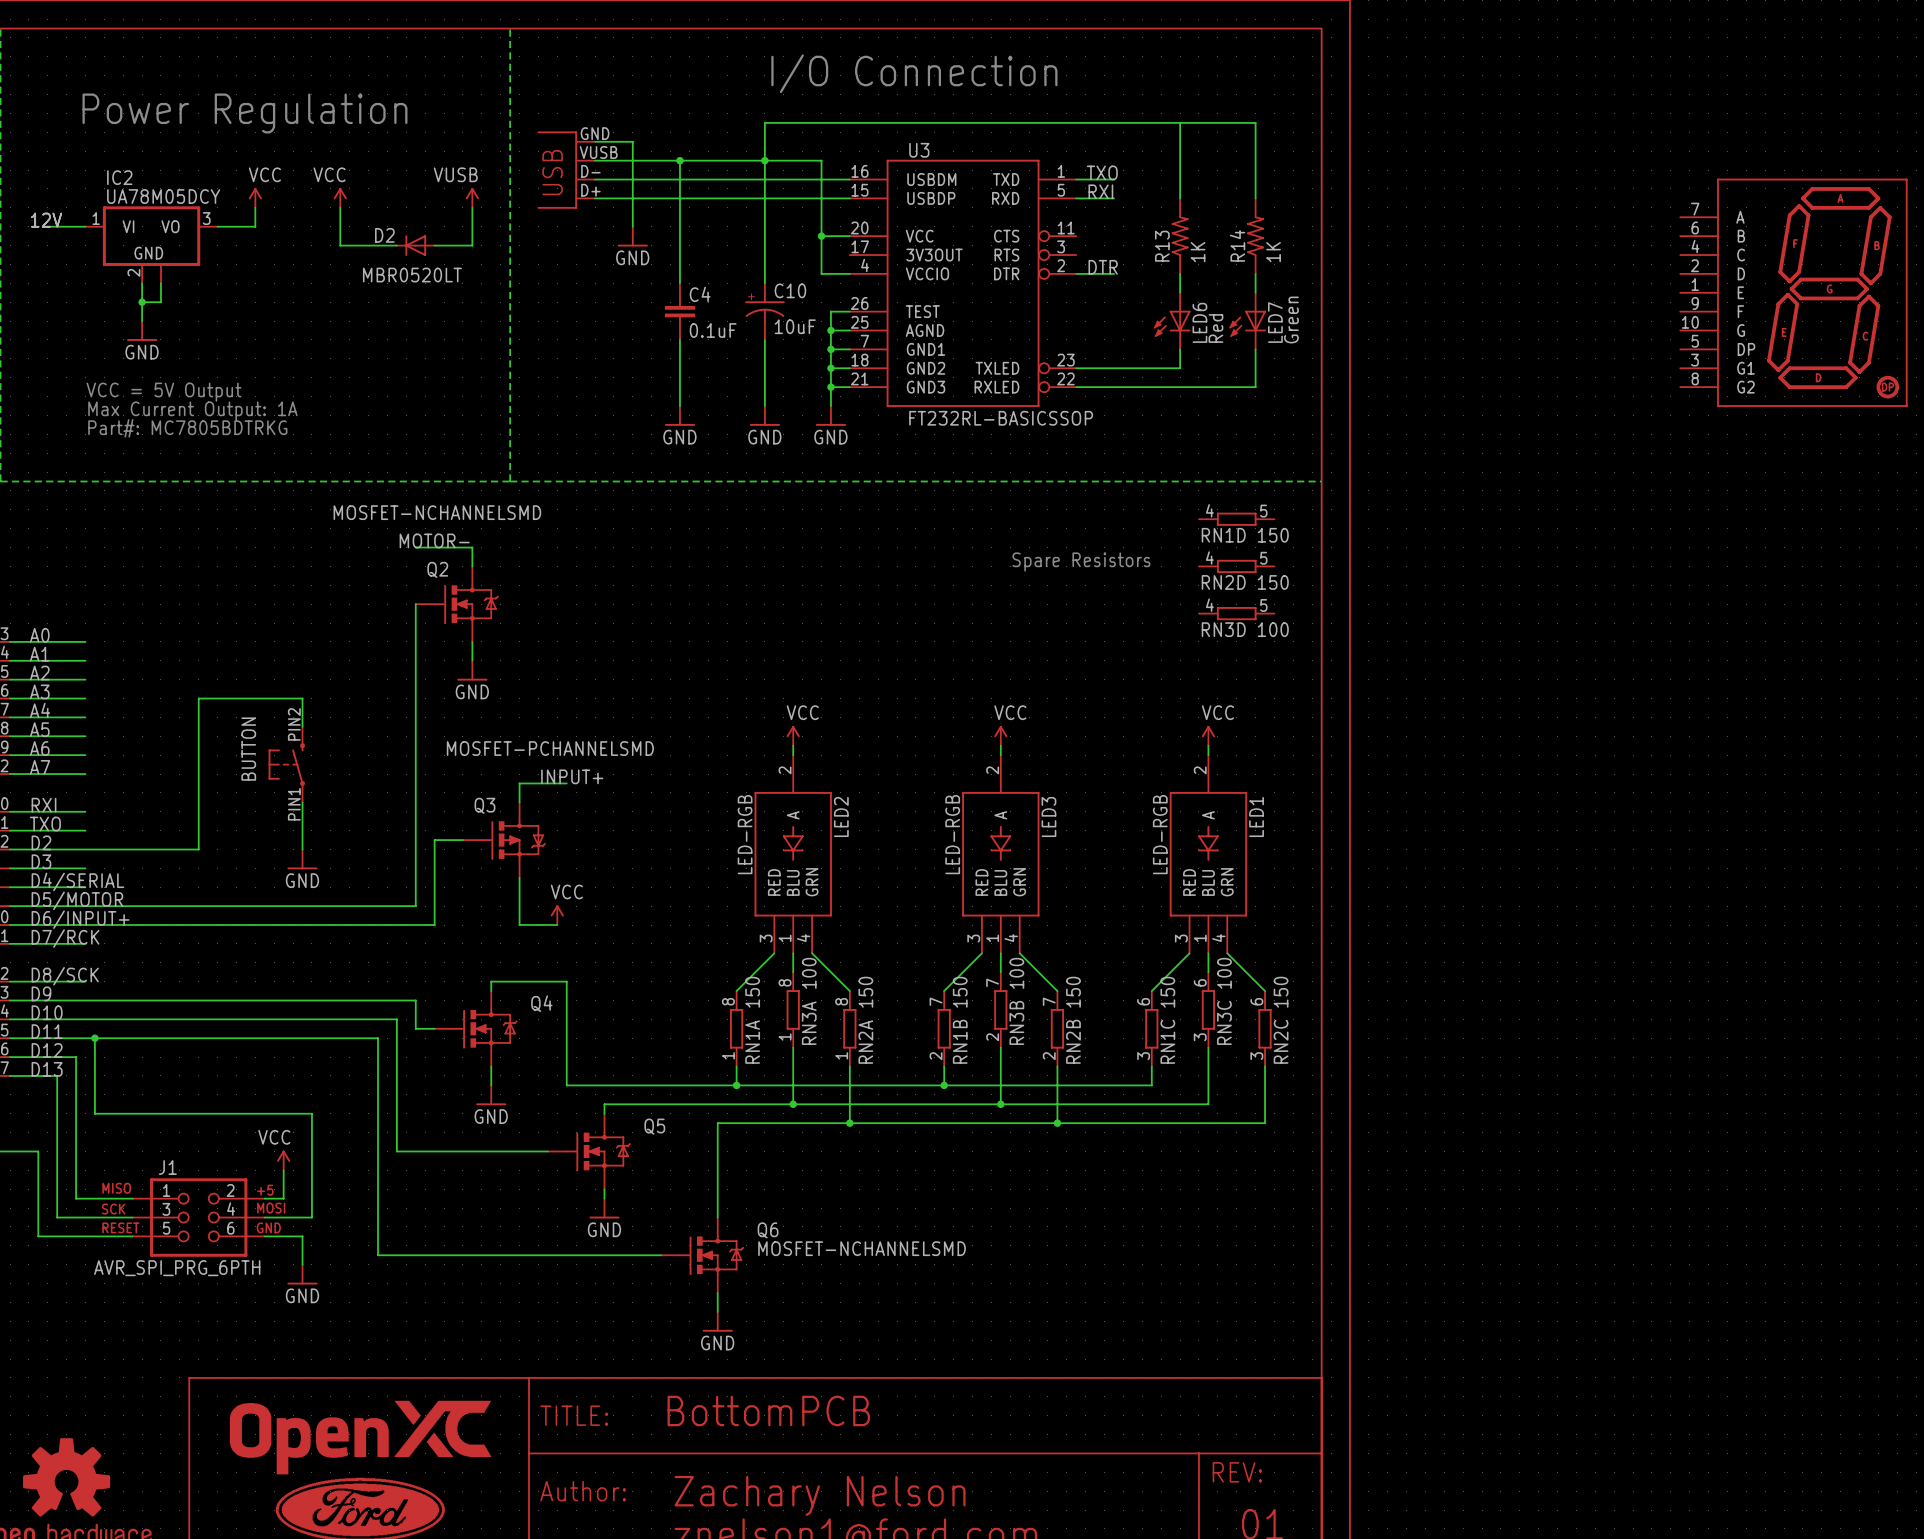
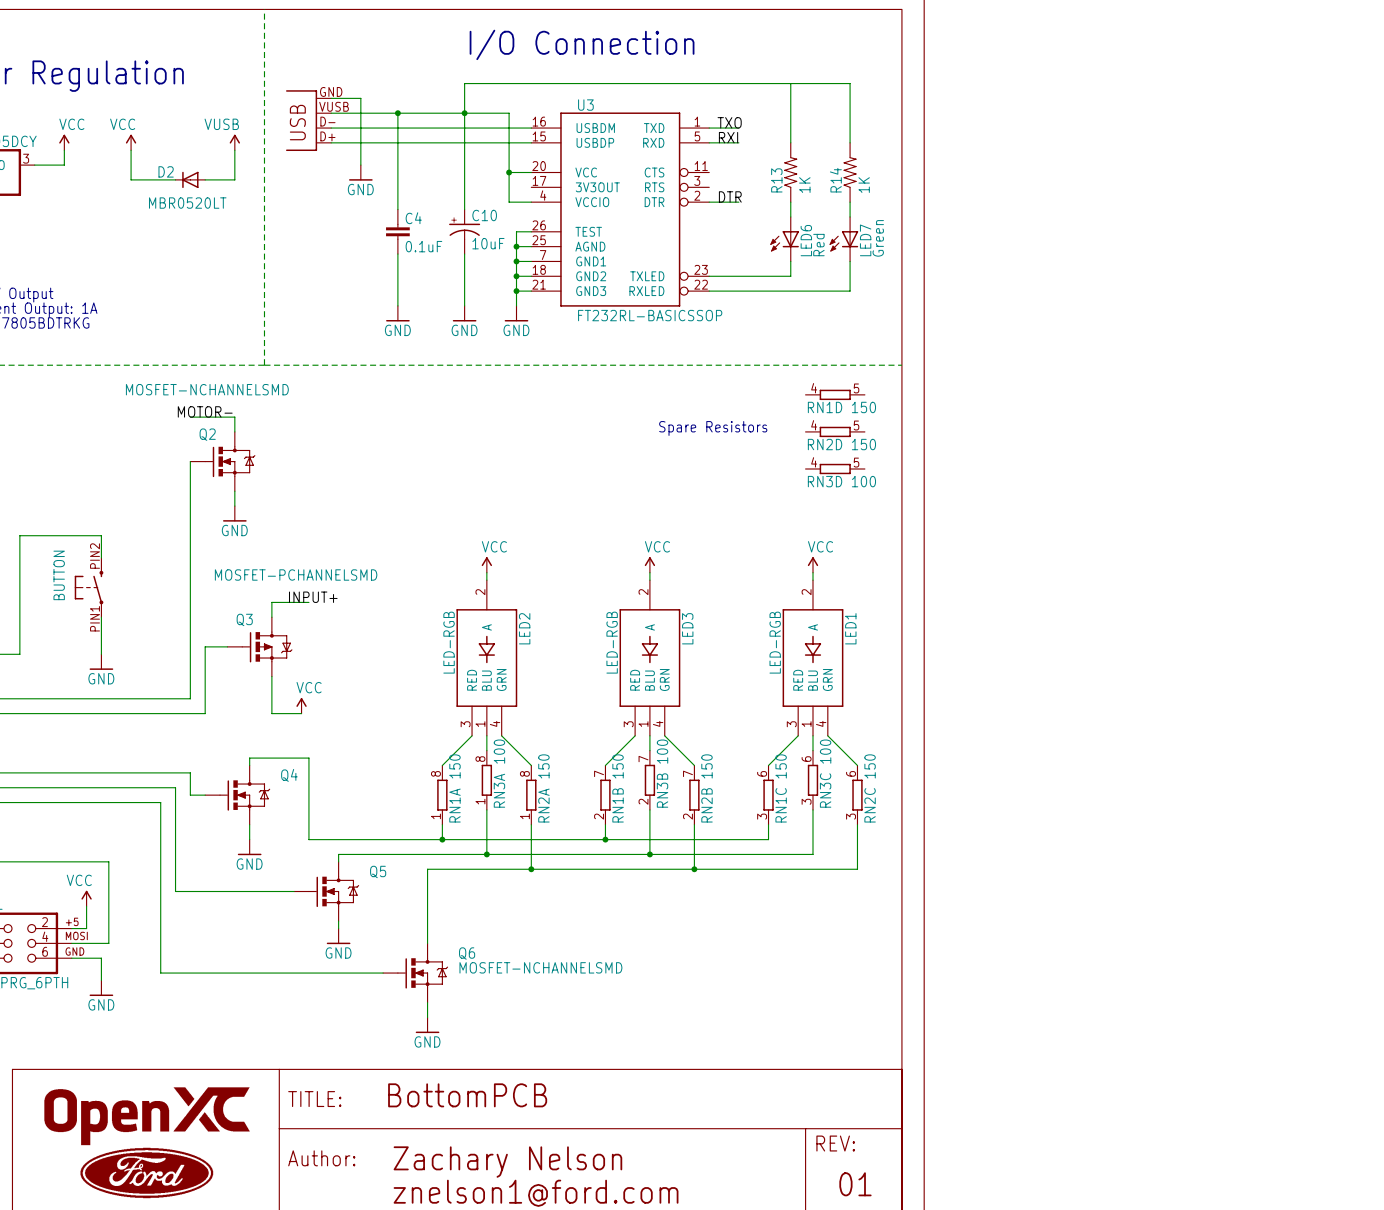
part: (1793, 292) -> none

